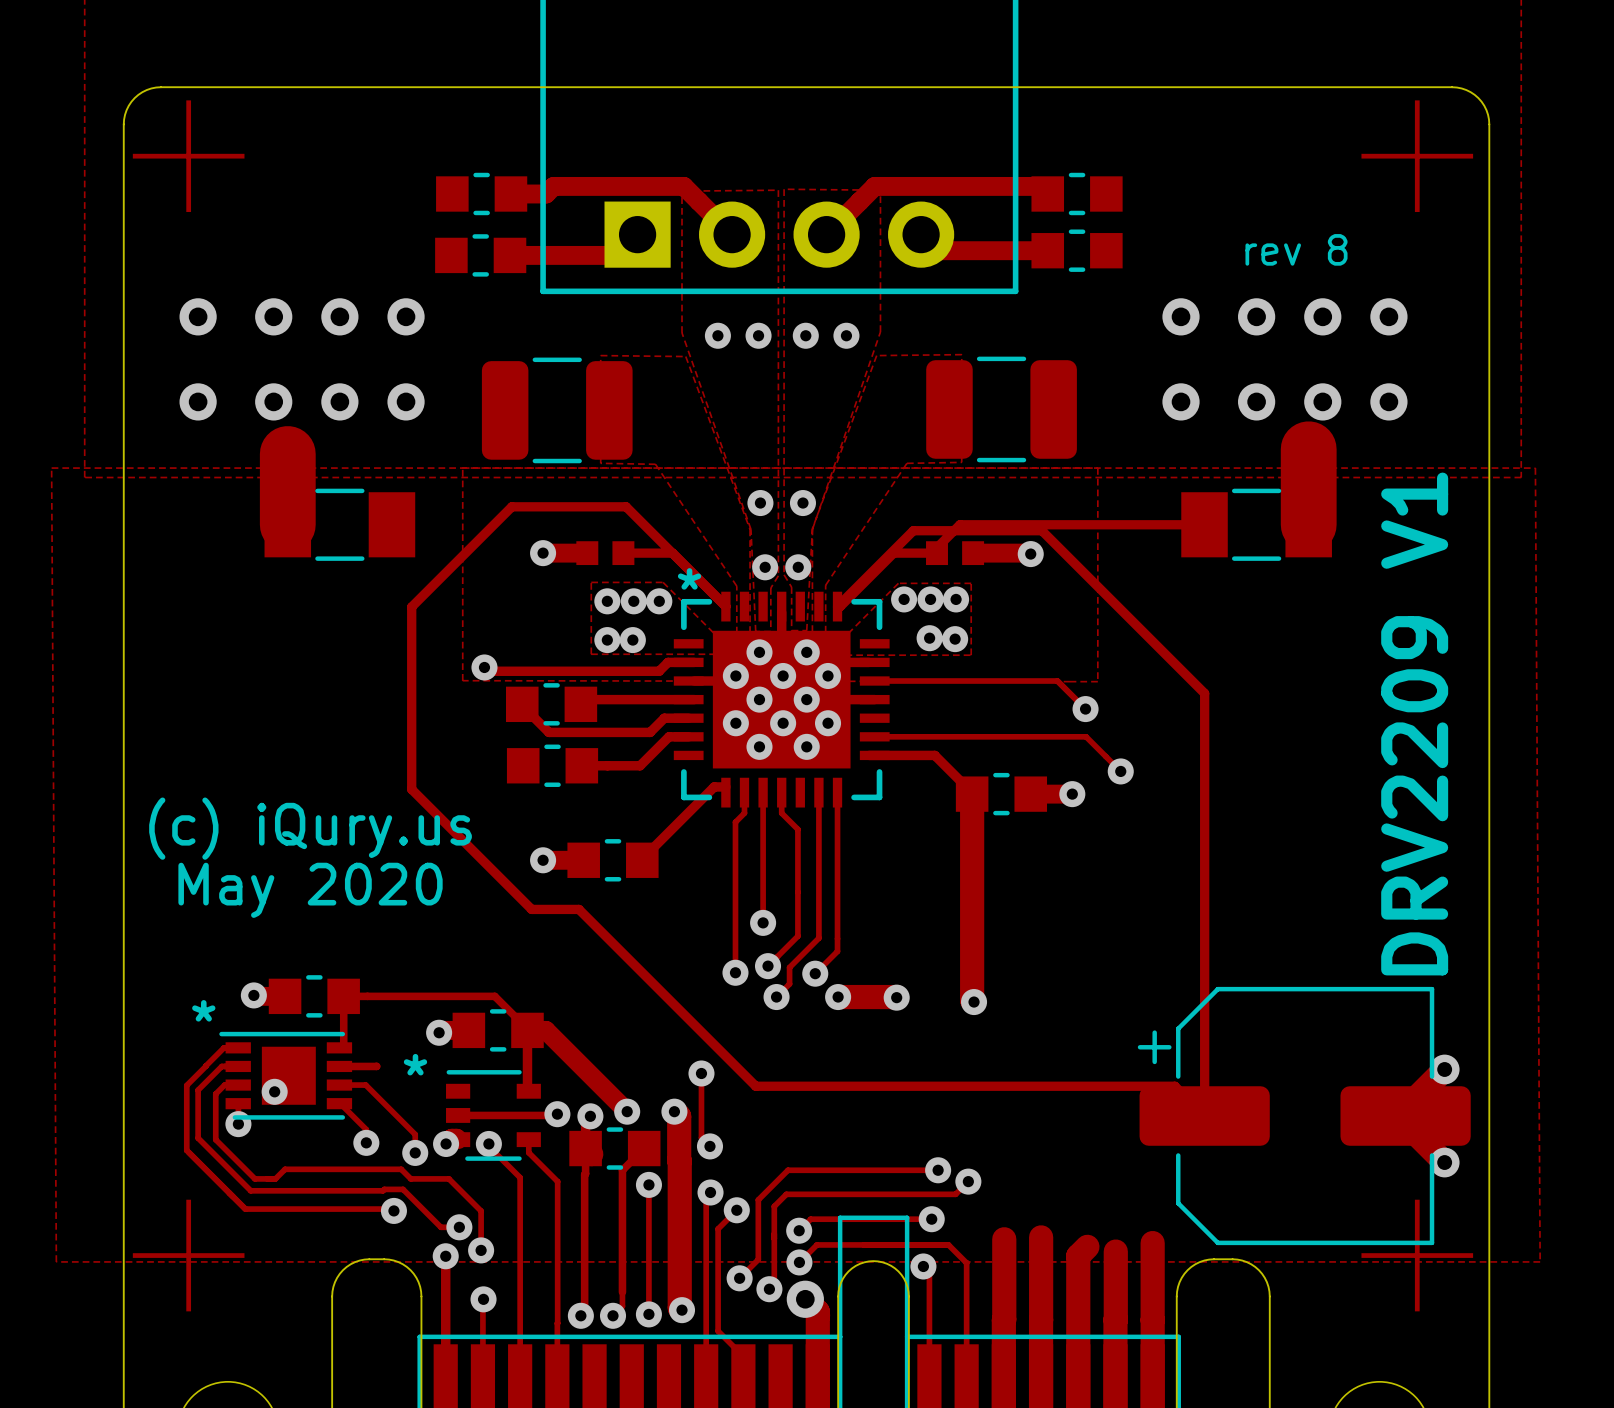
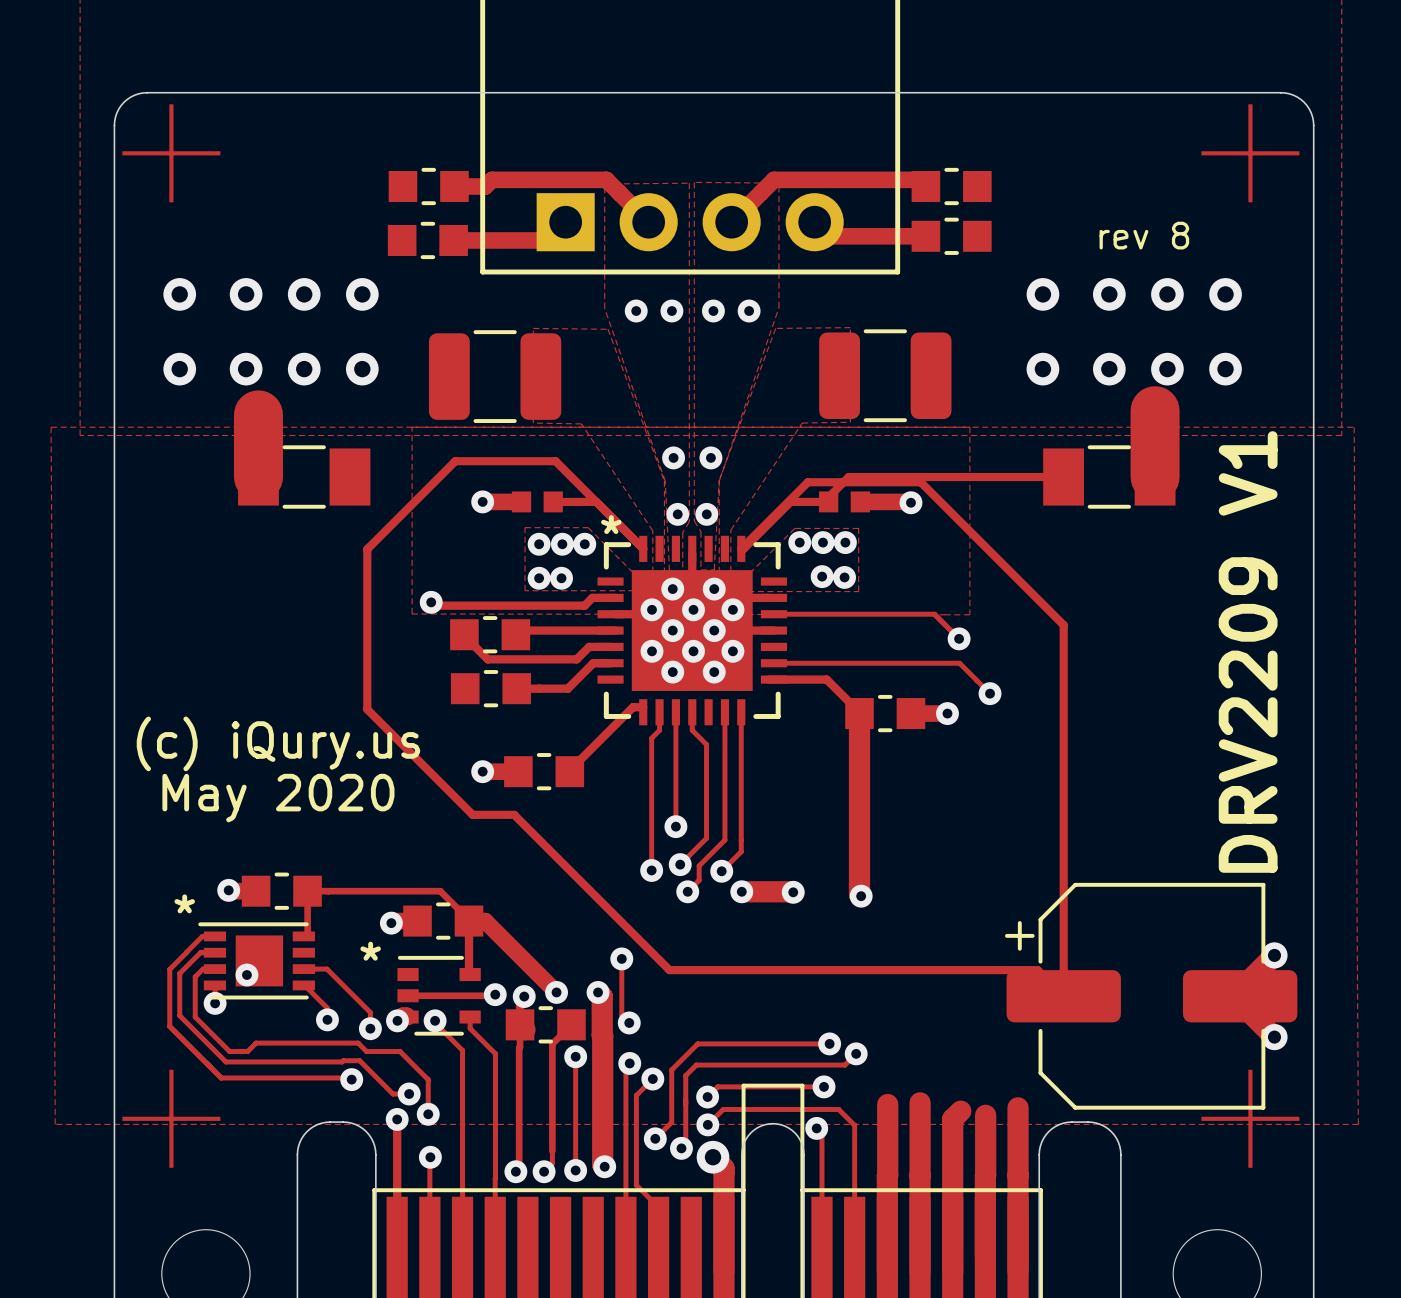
track: (343, 1066) (376, 1066) -> none

